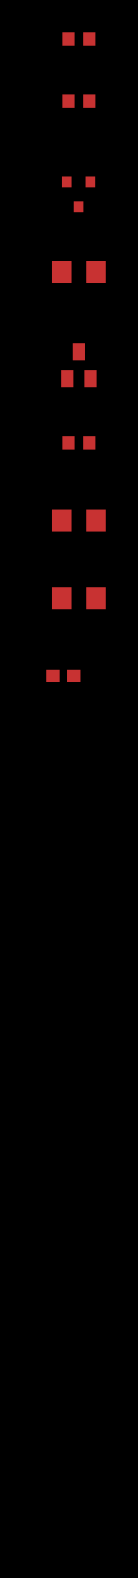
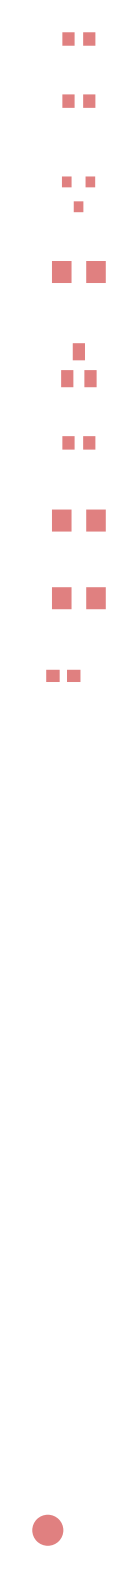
part: none -> (47, 1530)

